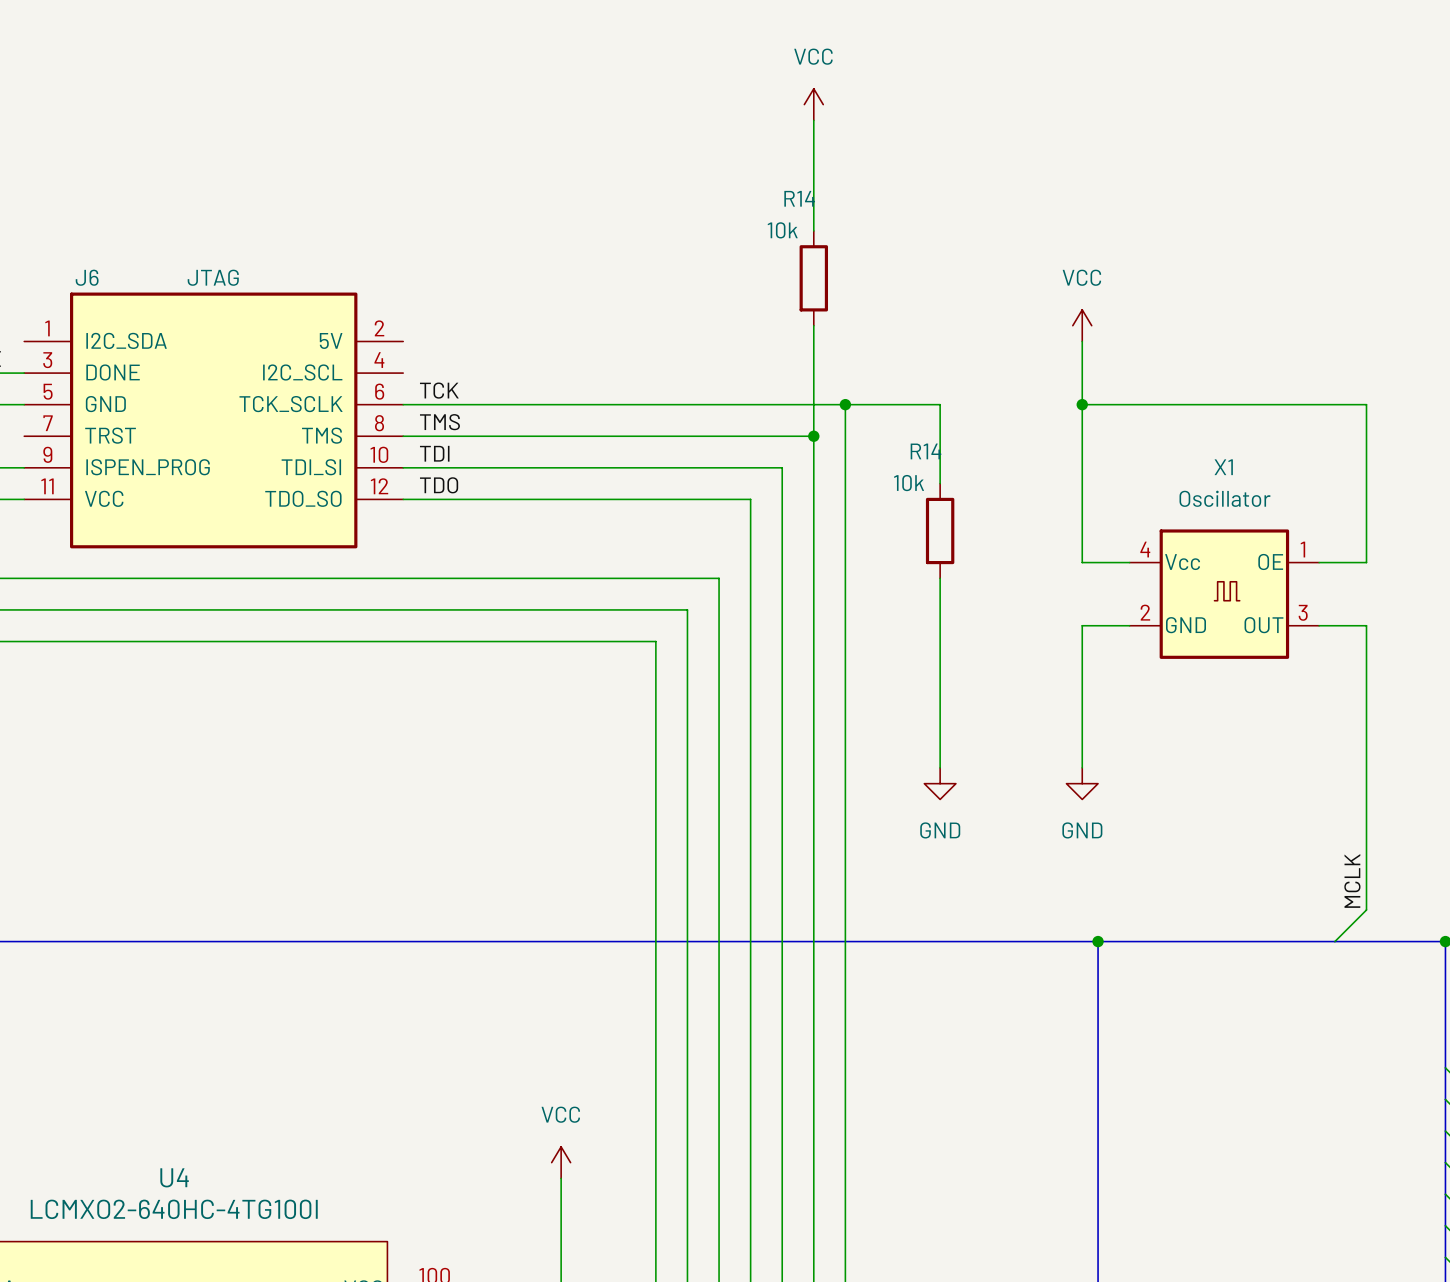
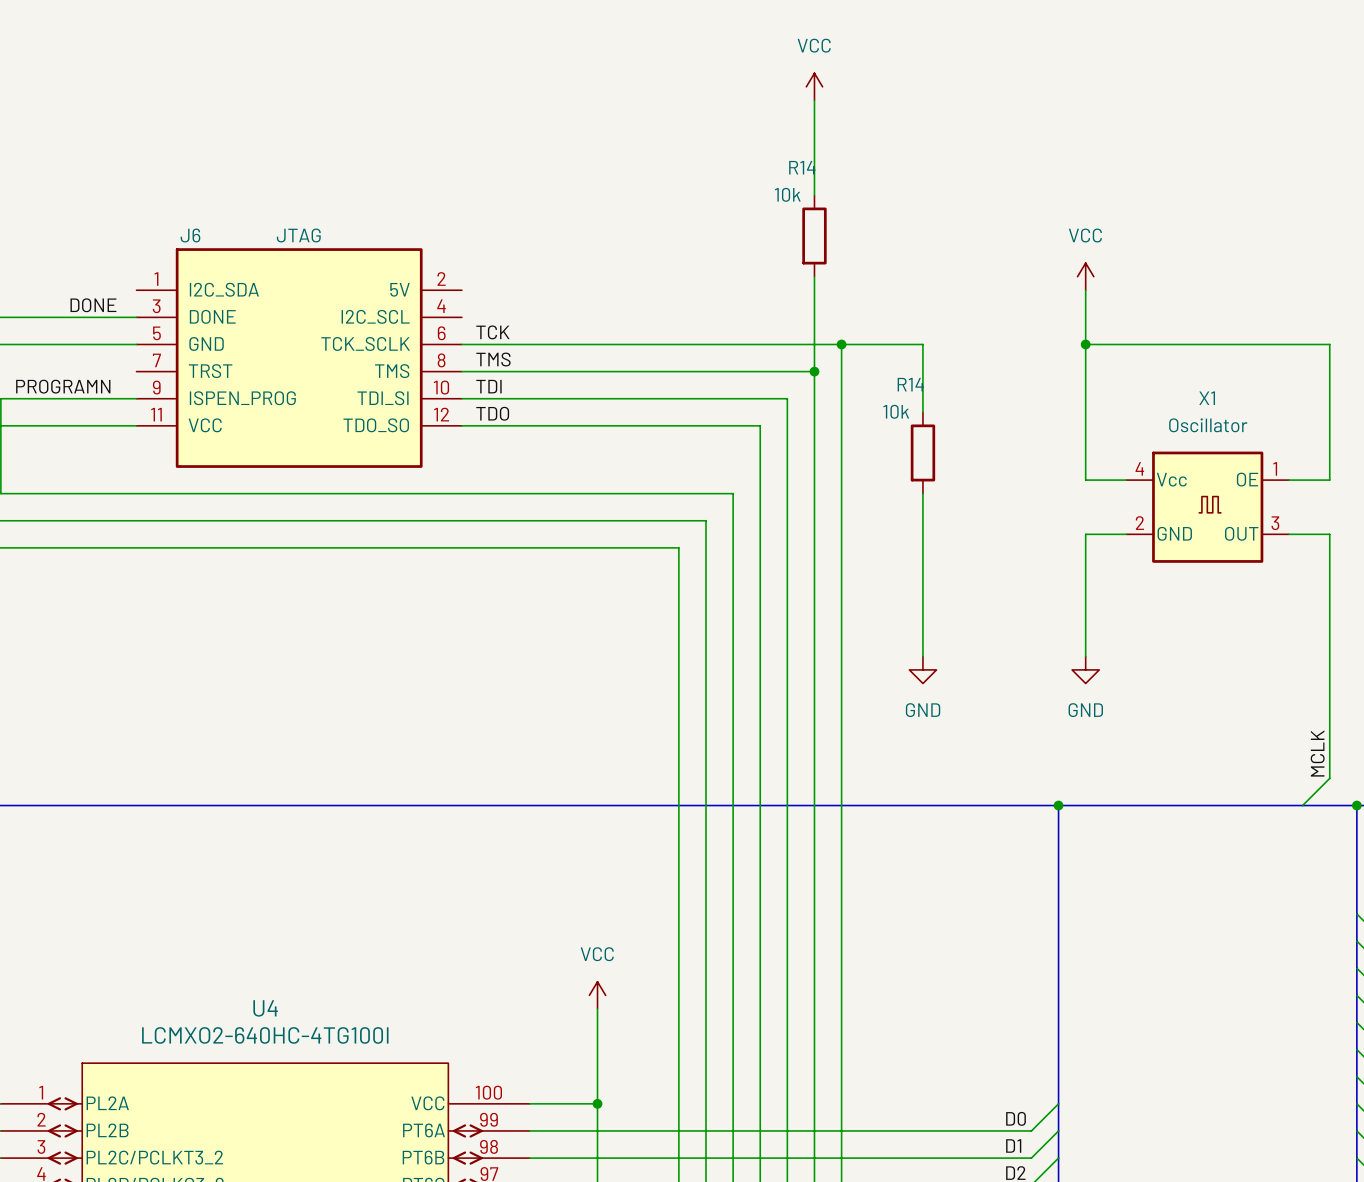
power symbol position: VCC (1082, 325) -> VCC (1085, 276)
wire: (1082, 341) (1082, 562) (1129, 562) -> (1085, 290) (1085, 480) (1126, 480)
wire: (1082, 404) (1129, 404) -> none
junction position: (1082, 404) -> (1085, 344)
wire: (1366, 404) (1366, 562) (1319, 562) -> (1289, 344) (1329, 344) (1329, 480) (1289, 480)
X1 position: (1224, 594) -> (1207, 507)
wire: (1129, 625) (1082, 625) (1082, 767) -> (1126, 534) (1085, 534) (1085, 656)
wire: (1319, 625) (1366, 625) (1366, 909) (1334, 941) -> (1289, 534) (1329, 534) (1329, 778) (1302, 805)
power symbol position: GND (1082, 783) -> GND (1085, 669)
label position: MCLK (1352, 881) -> MCLK (1317, 753)

